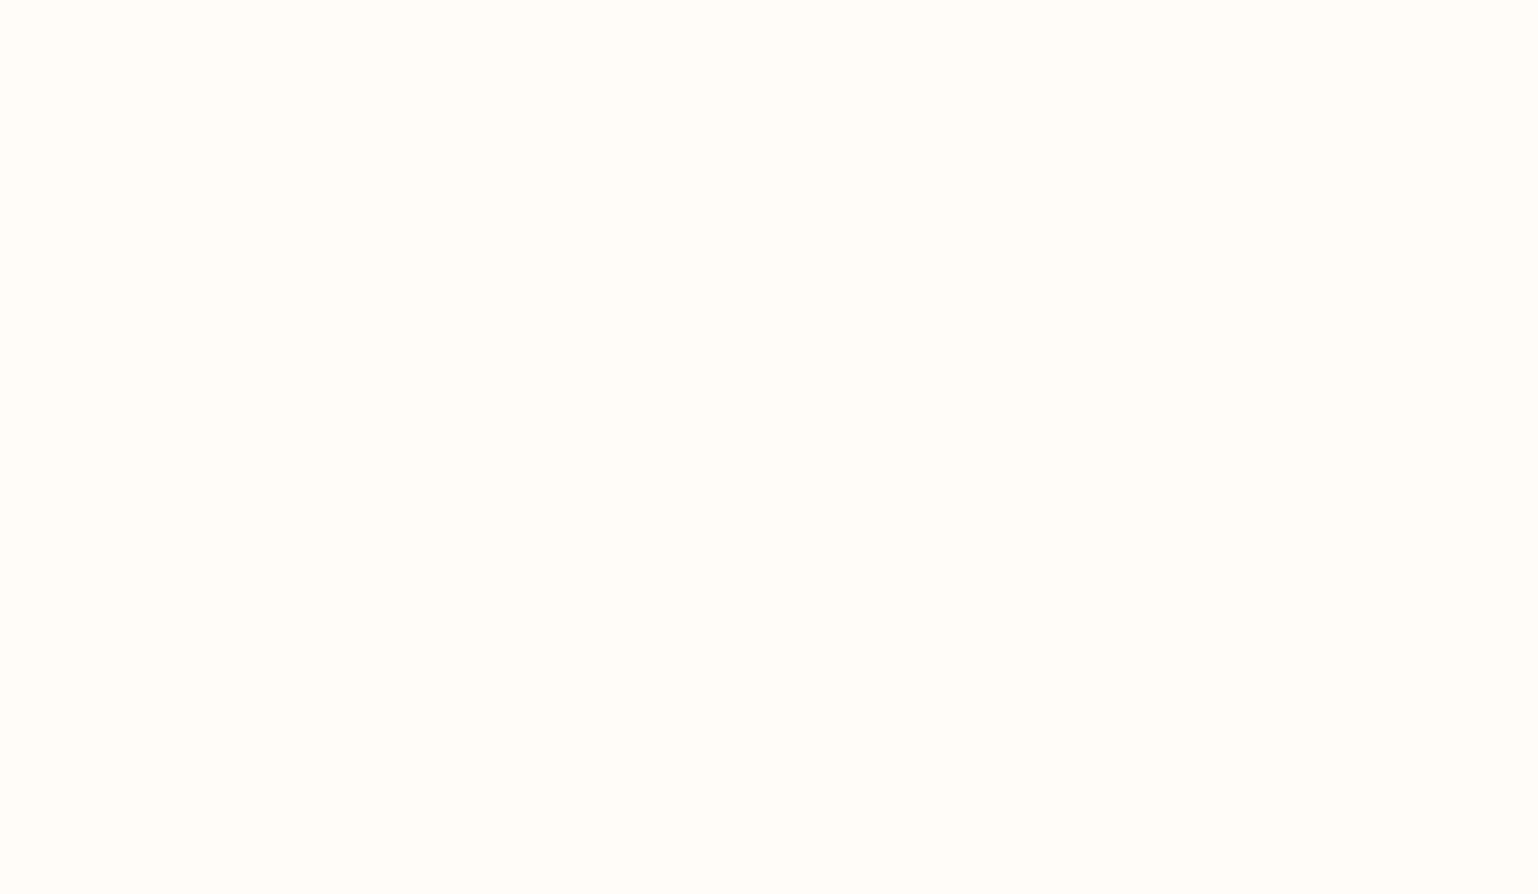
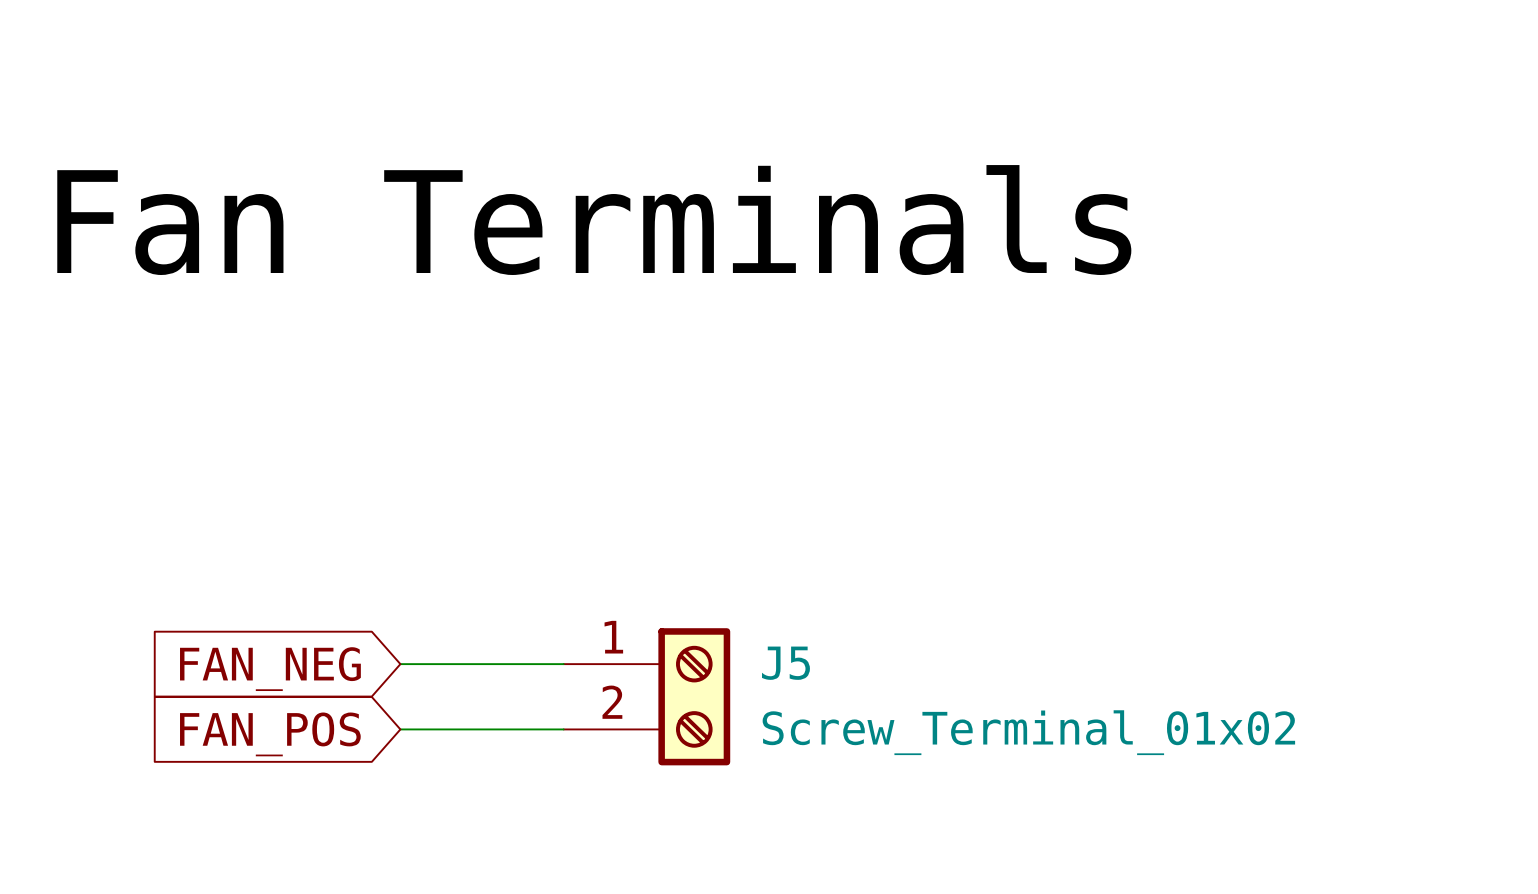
label: none -> Fan Terminals (594, 220)
wire: none -> (400, 664) (563, 664)
global label: none -> FAN_NEG (270, 669)
J5: none -> Screw_Terminal_01x02 (646, 696)
wire: none -> (400, 729) (563, 729)
global label: none -> FAN_POS (270, 734)

